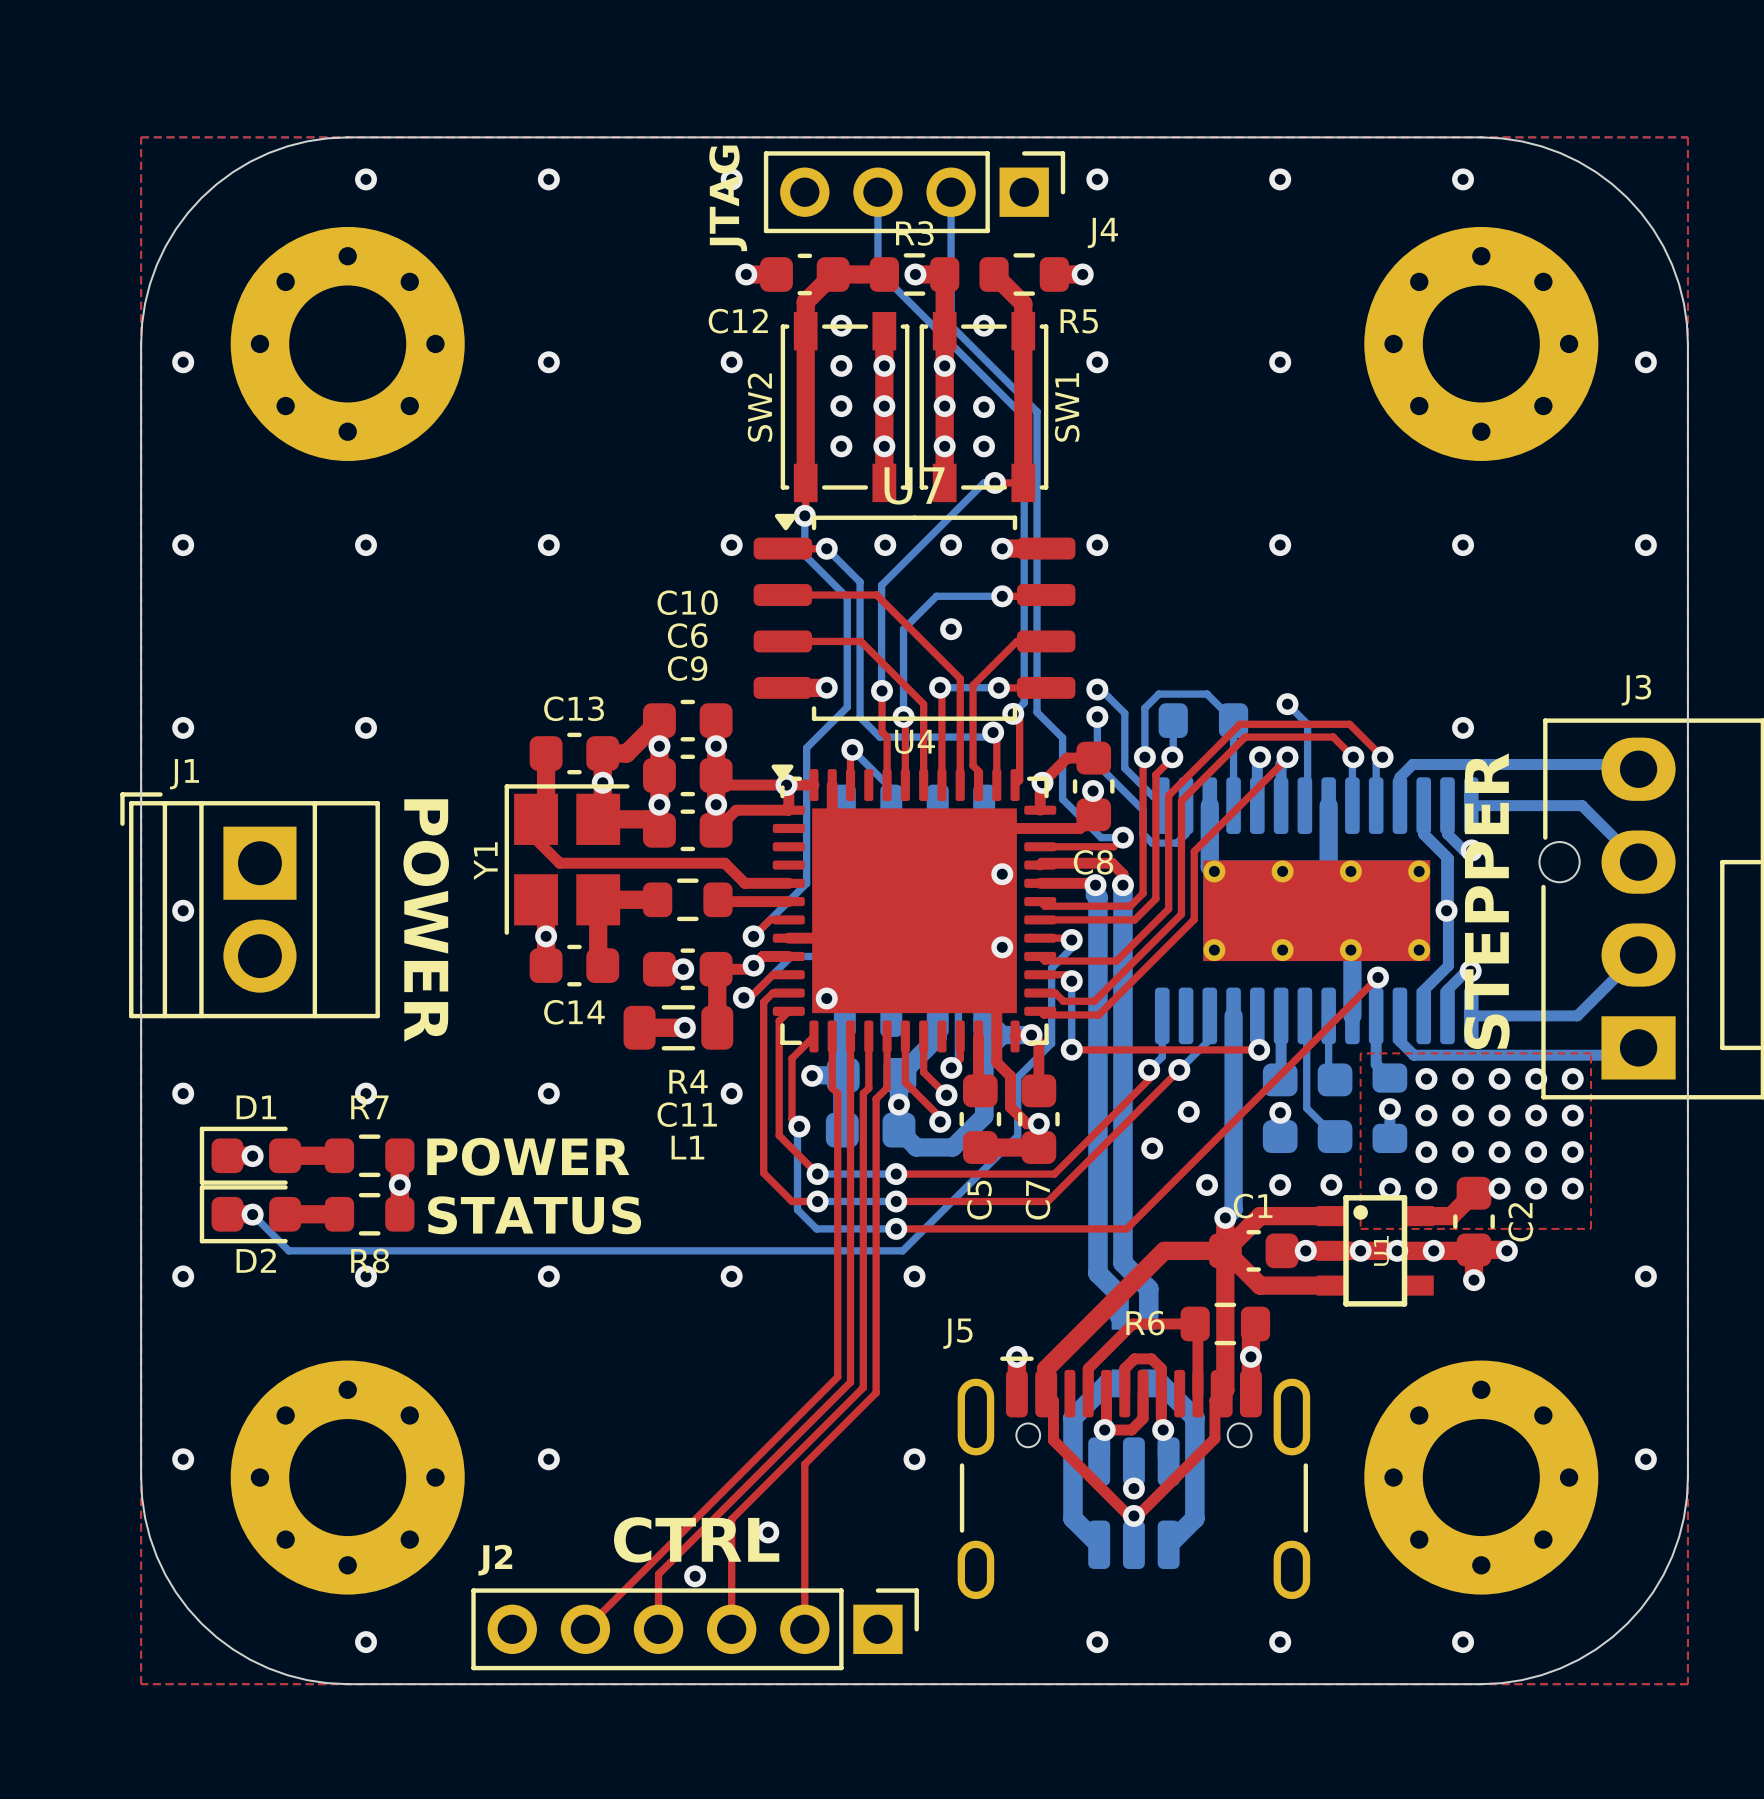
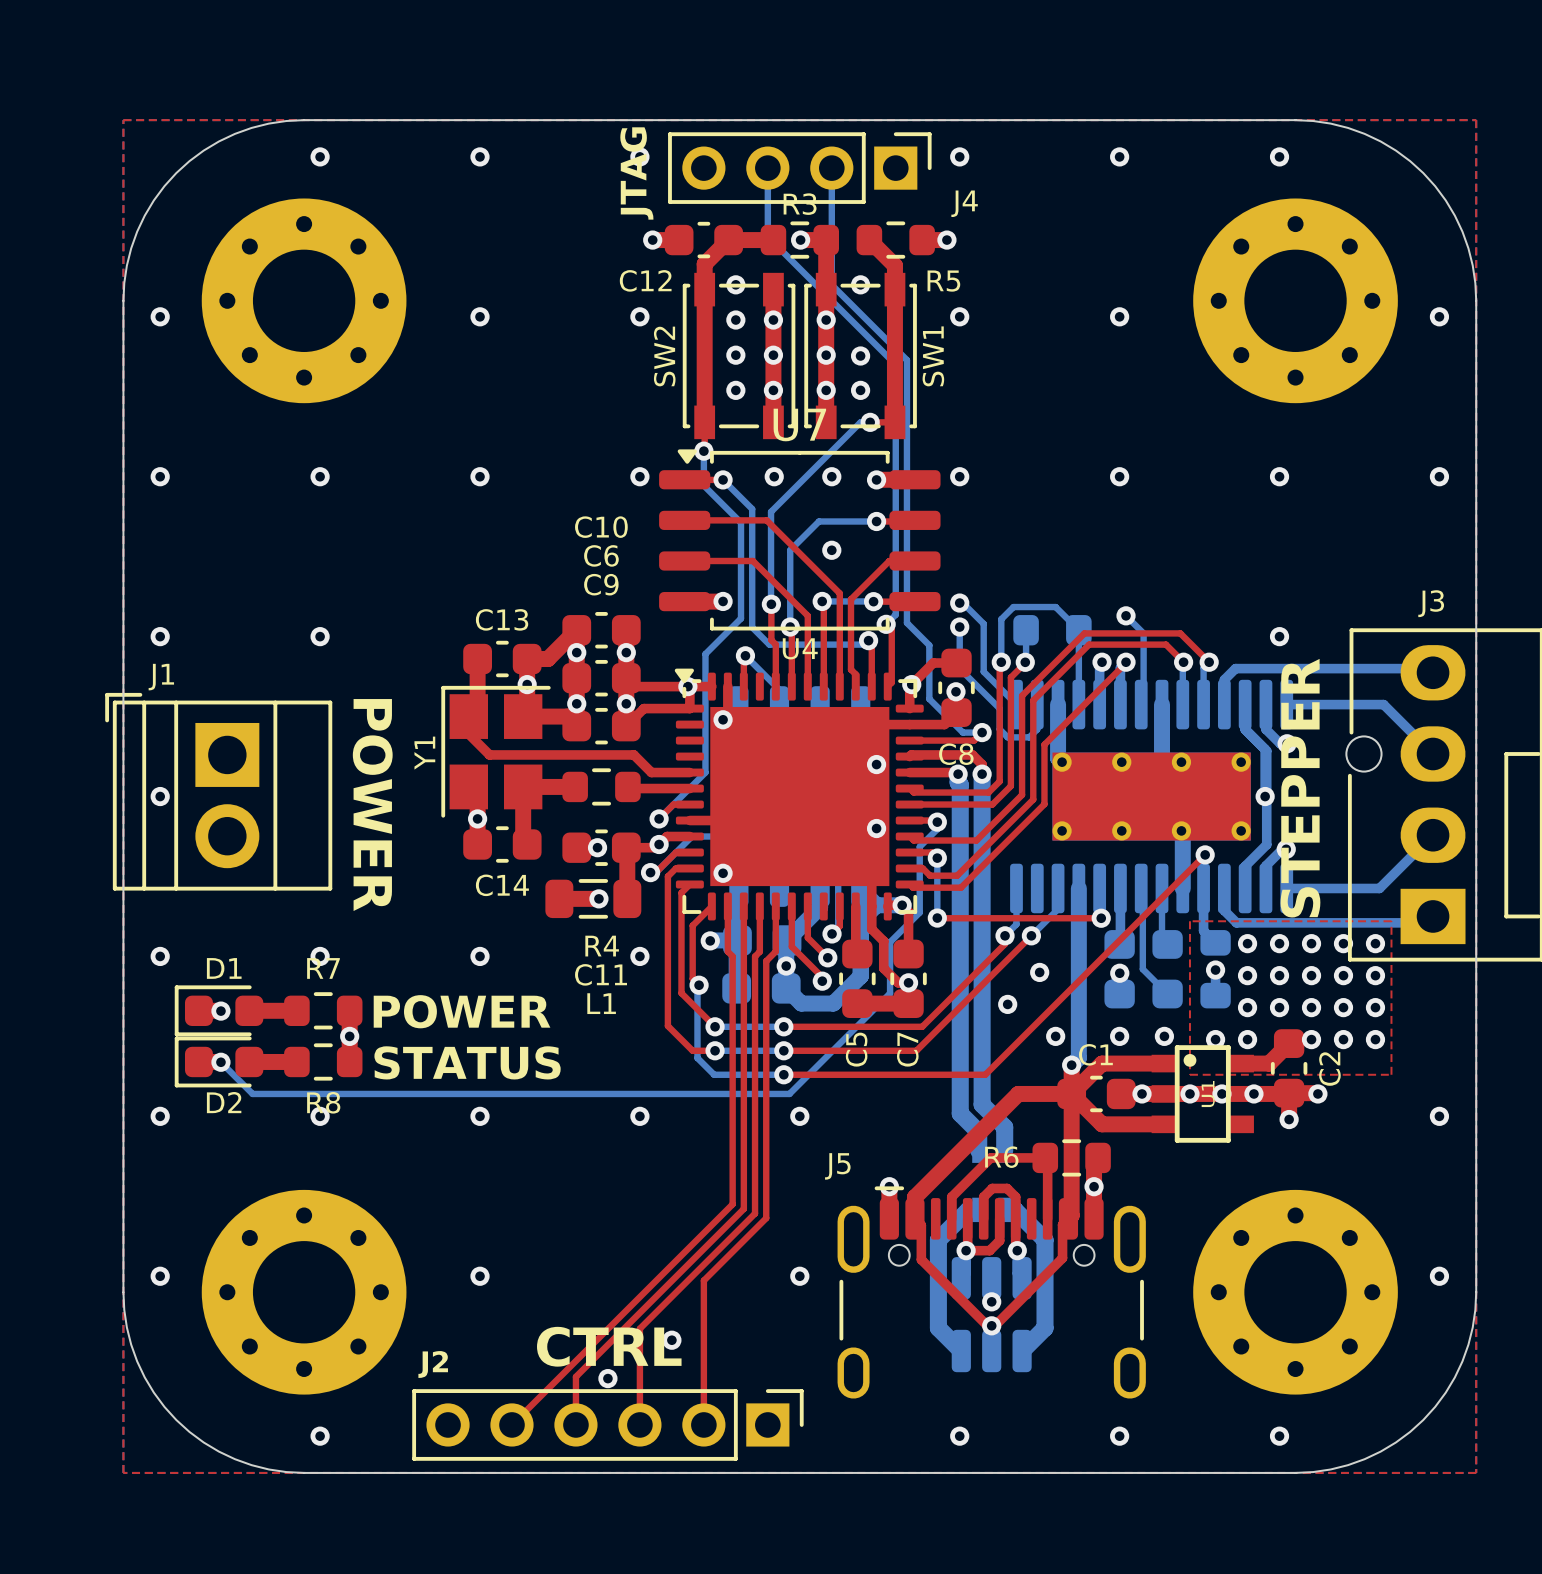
via: none -> (723, 719)

